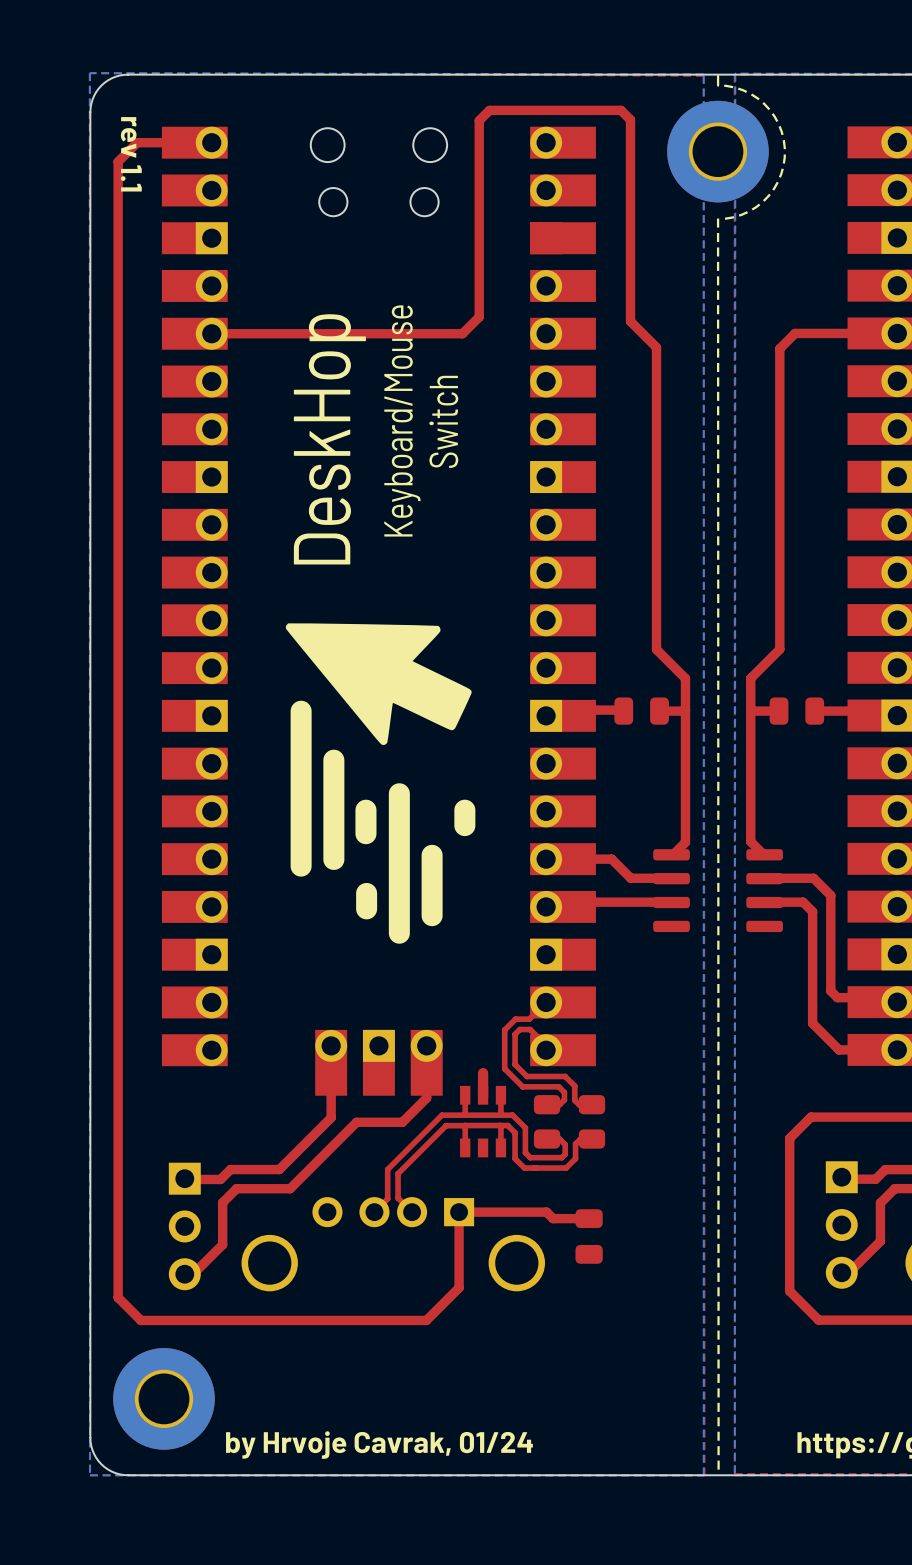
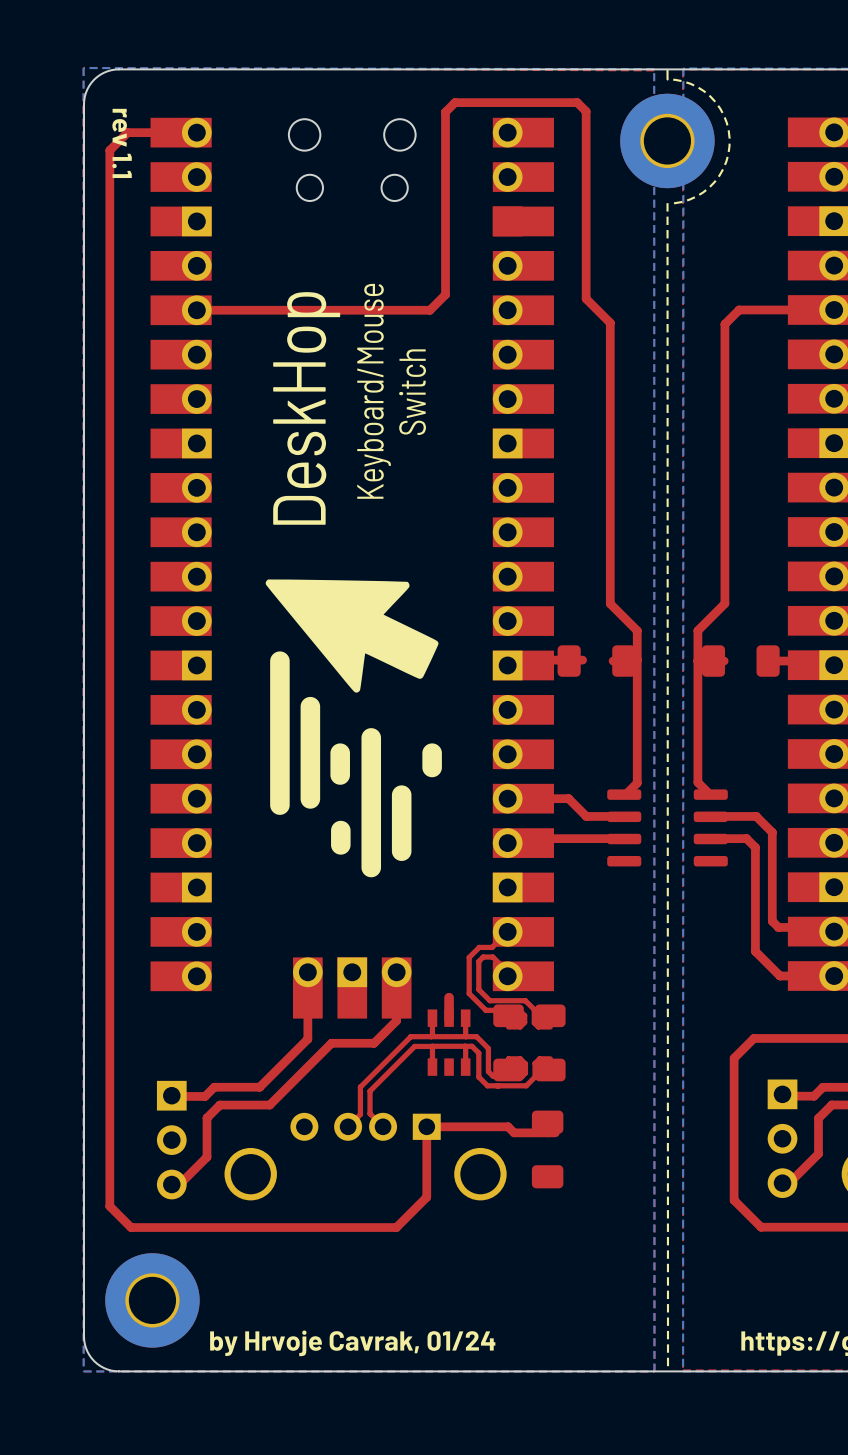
part footprint: [614, 697, 669, 725] -> [557, 645, 636, 677]
part footprint: [769, 697, 825, 725] -> [701, 645, 780, 677]
part footprint: [533, 1095, 561, 1149] -> [493, 1004, 524, 1082]
part footprint: [578, 1095, 606, 1149] -> [535, 1004, 566, 1082]
part footprint: [575, 1209, 603, 1264] -> [531, 1110, 564, 1189]

